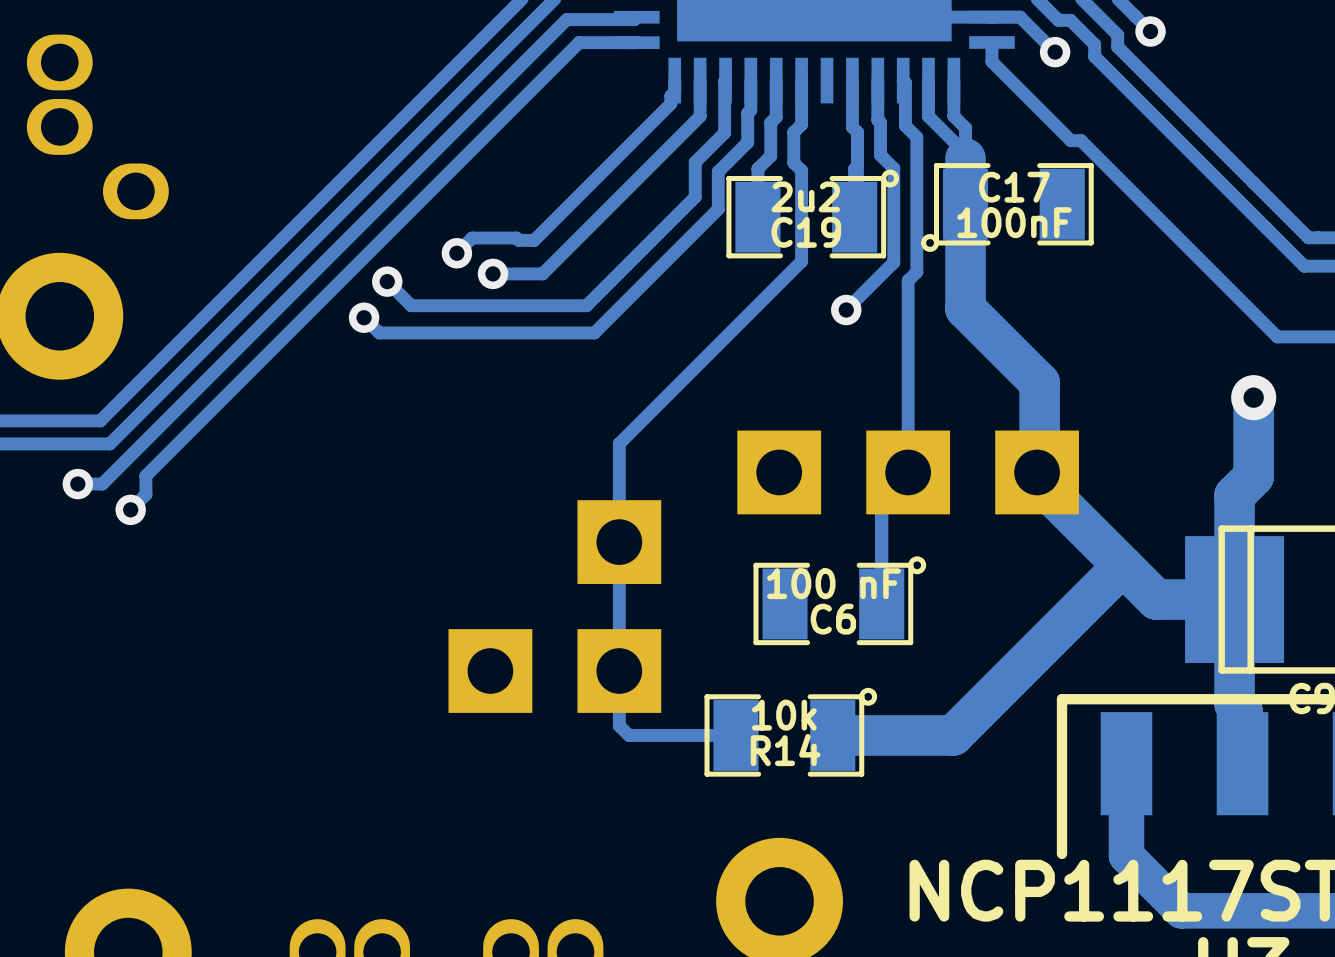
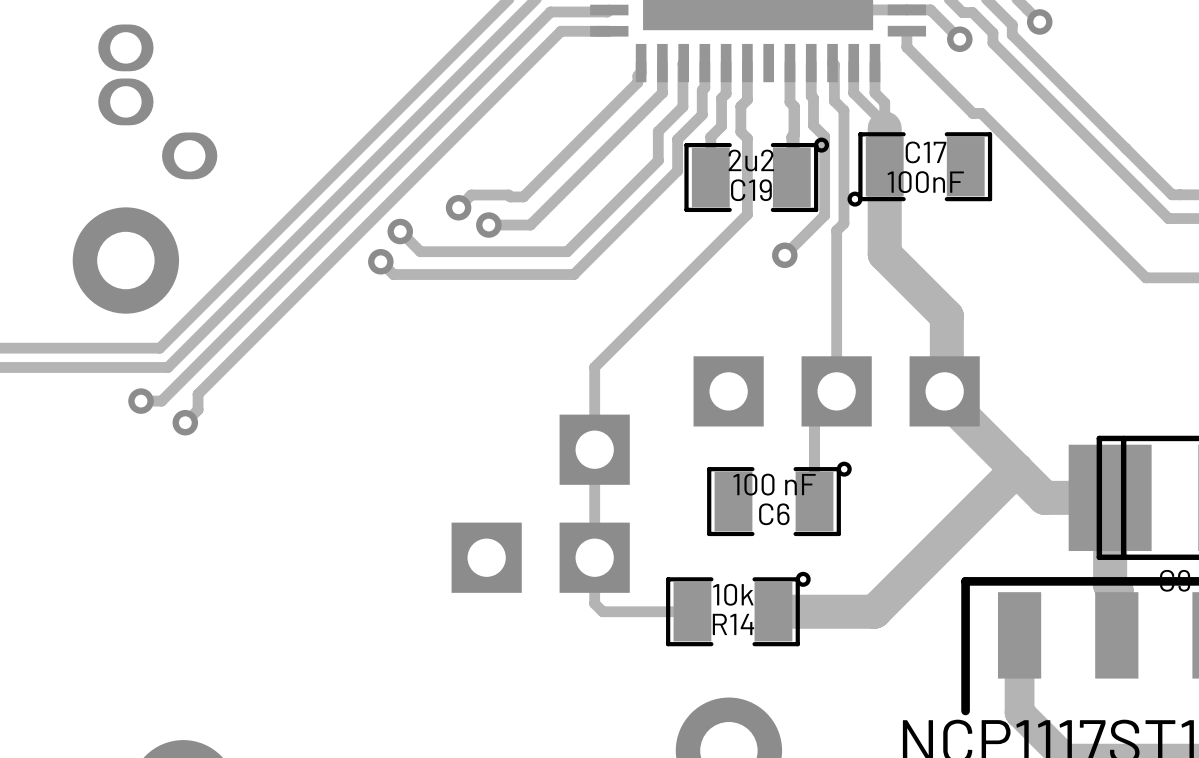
track: (1253, 397) (1253, 476) (1234, 495) (1234, 599) -> none
via: (1253, 397) -> none

